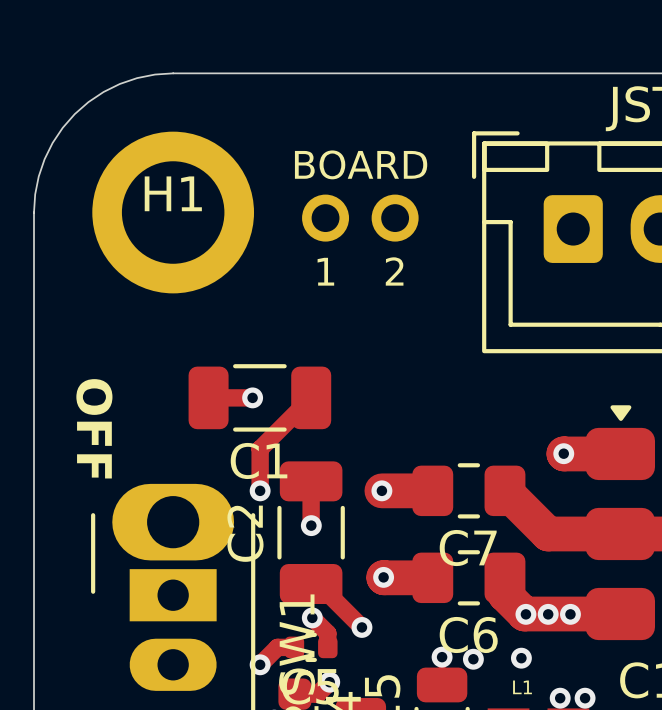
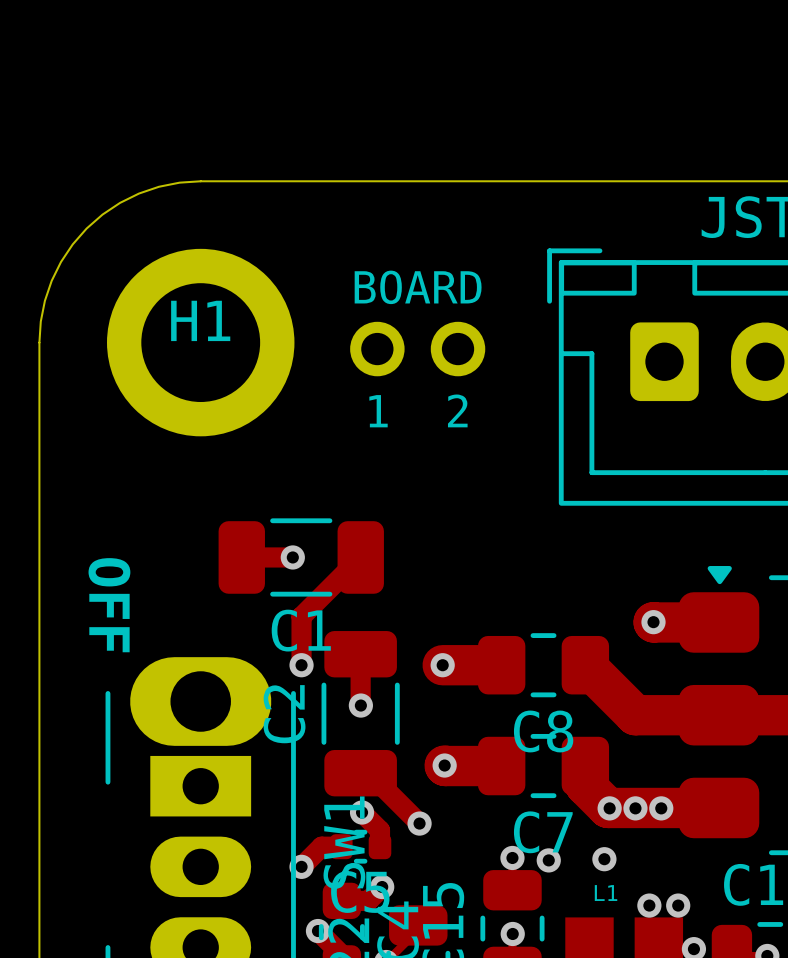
C7 name: C7 (468, 548) -> C8 (543, 731)
C6 name: C6 (468, 634) -> C7 (543, 832)

